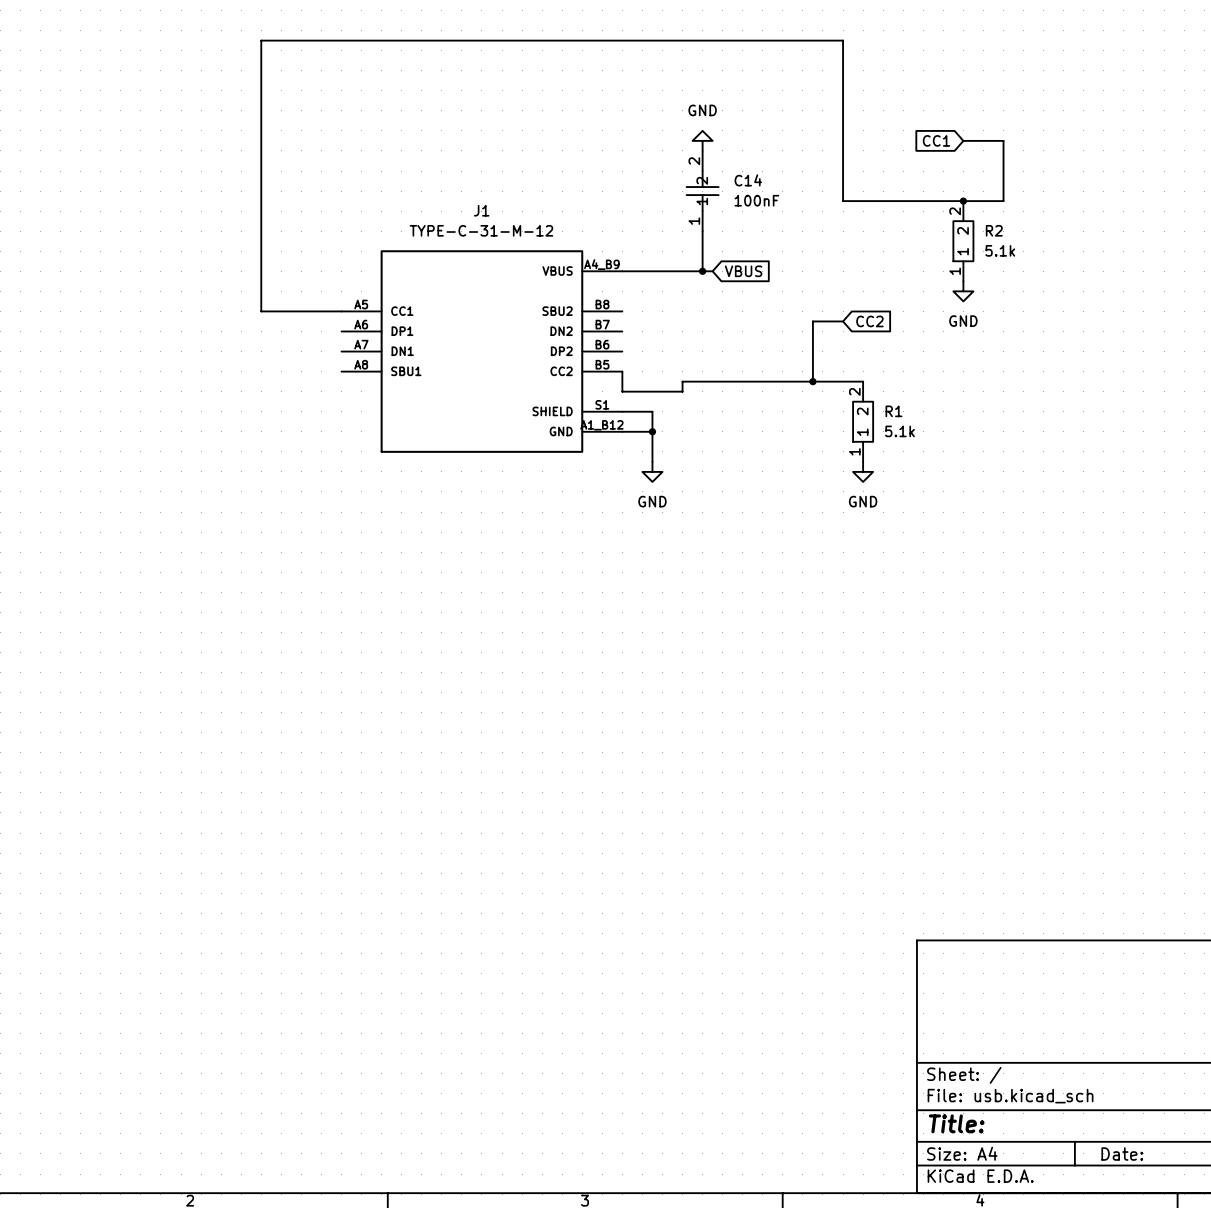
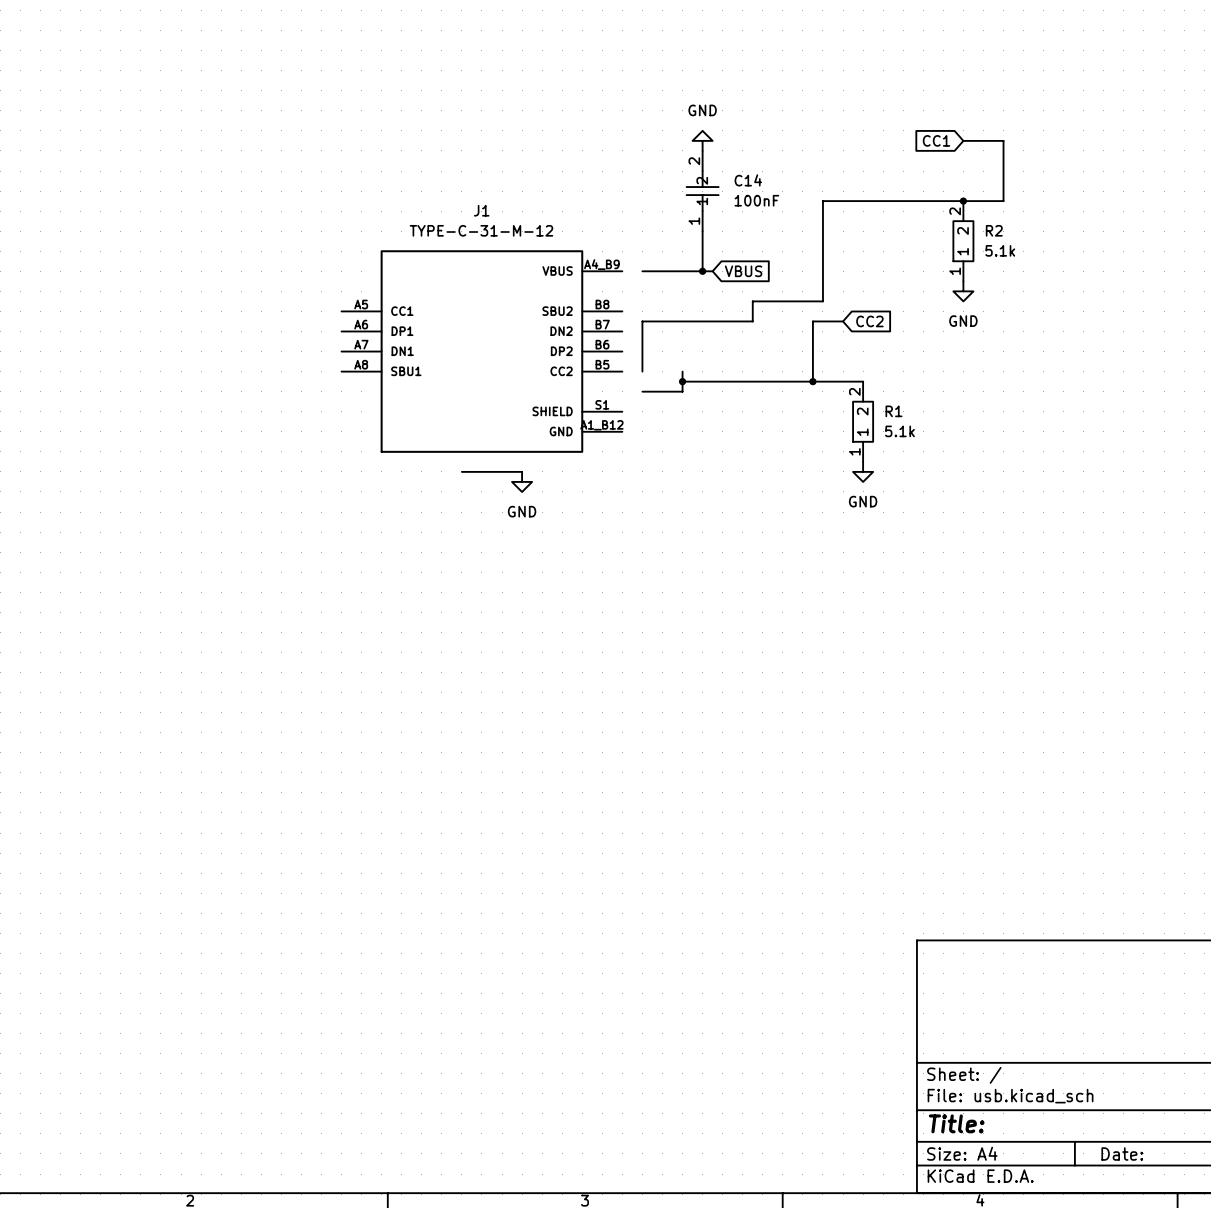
wire: (843, 201) (843, 40) (261, 40) (261, 311) (341, 311) -> (843, 201) (822, 201) (822, 301) (752, 301) (752, 321) (642, 321) (642, 371)
wire: (622, 271) (642, 271) -> none
wire: (622, 371) (622, 391) (642, 391) -> none
wire: none -> (682, 371) (682, 381)
junction: none -> (682, 381)
wire: (622, 411) (652, 411) (652, 461) -> none
wire: (622, 431) (652, 431) -> none
junction: (652, 431) -> none
wire: none -> (461, 471) (522, 471)
power symbol position: GND (652, 471) -> GND (522, 481)

